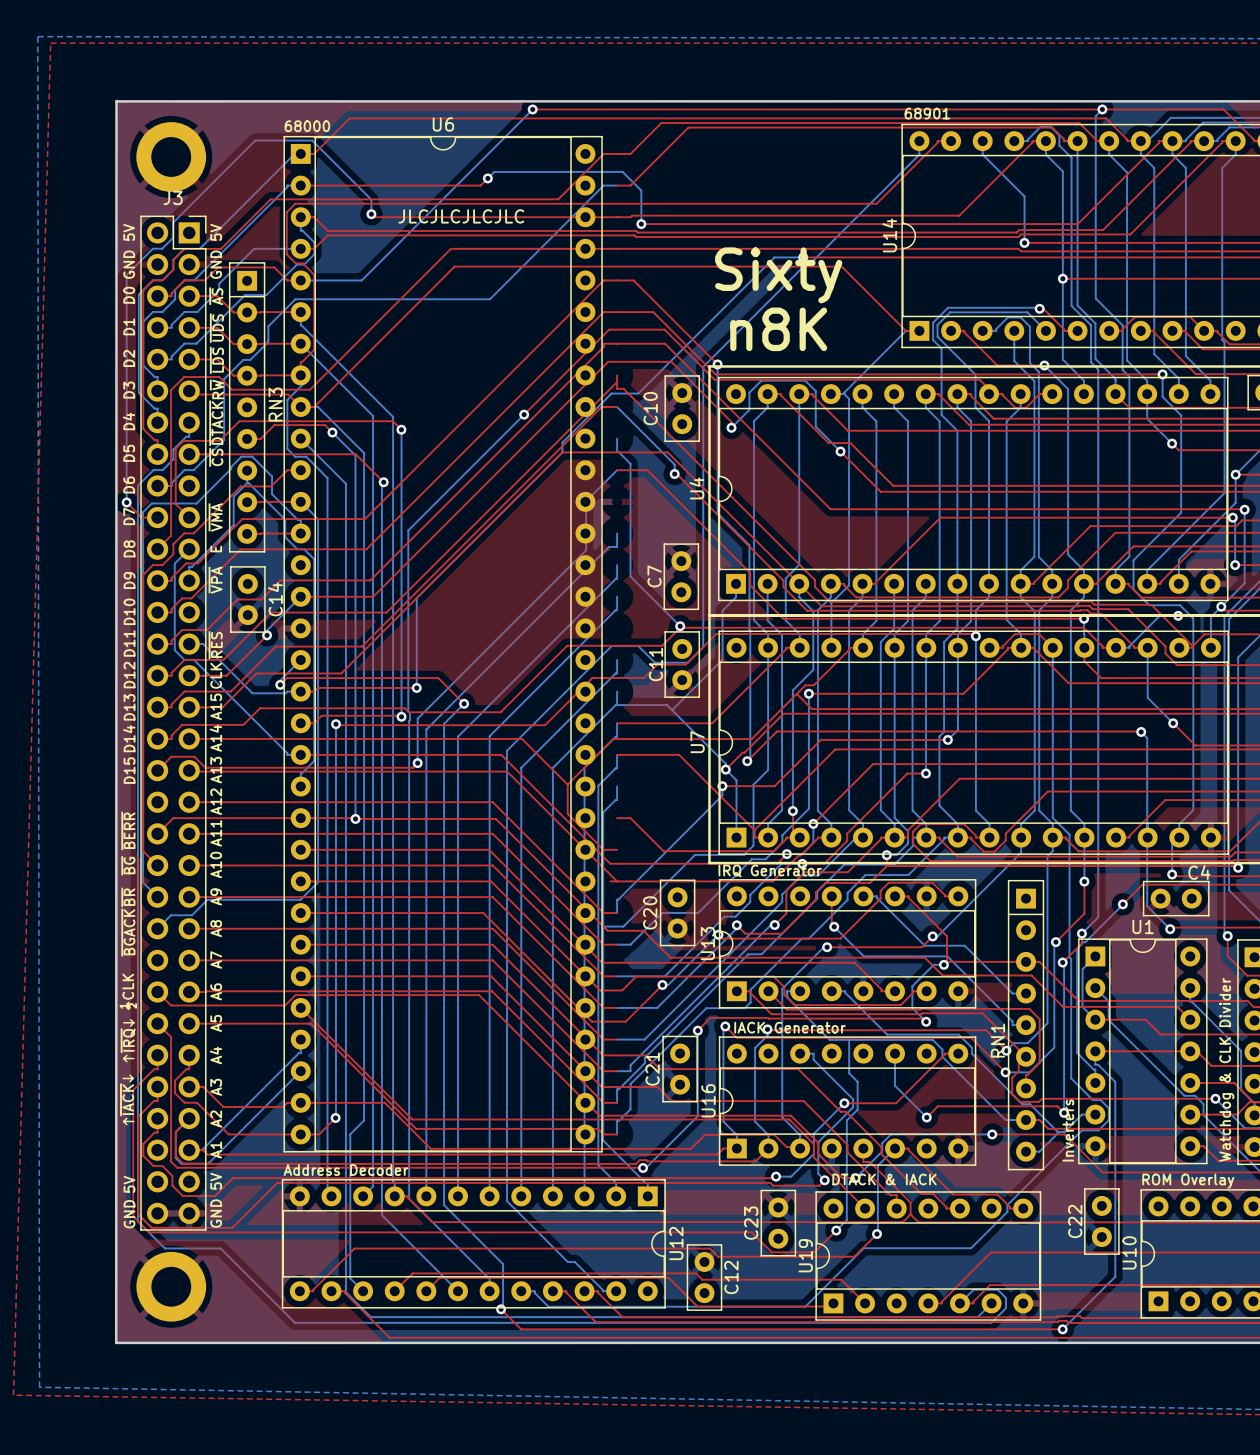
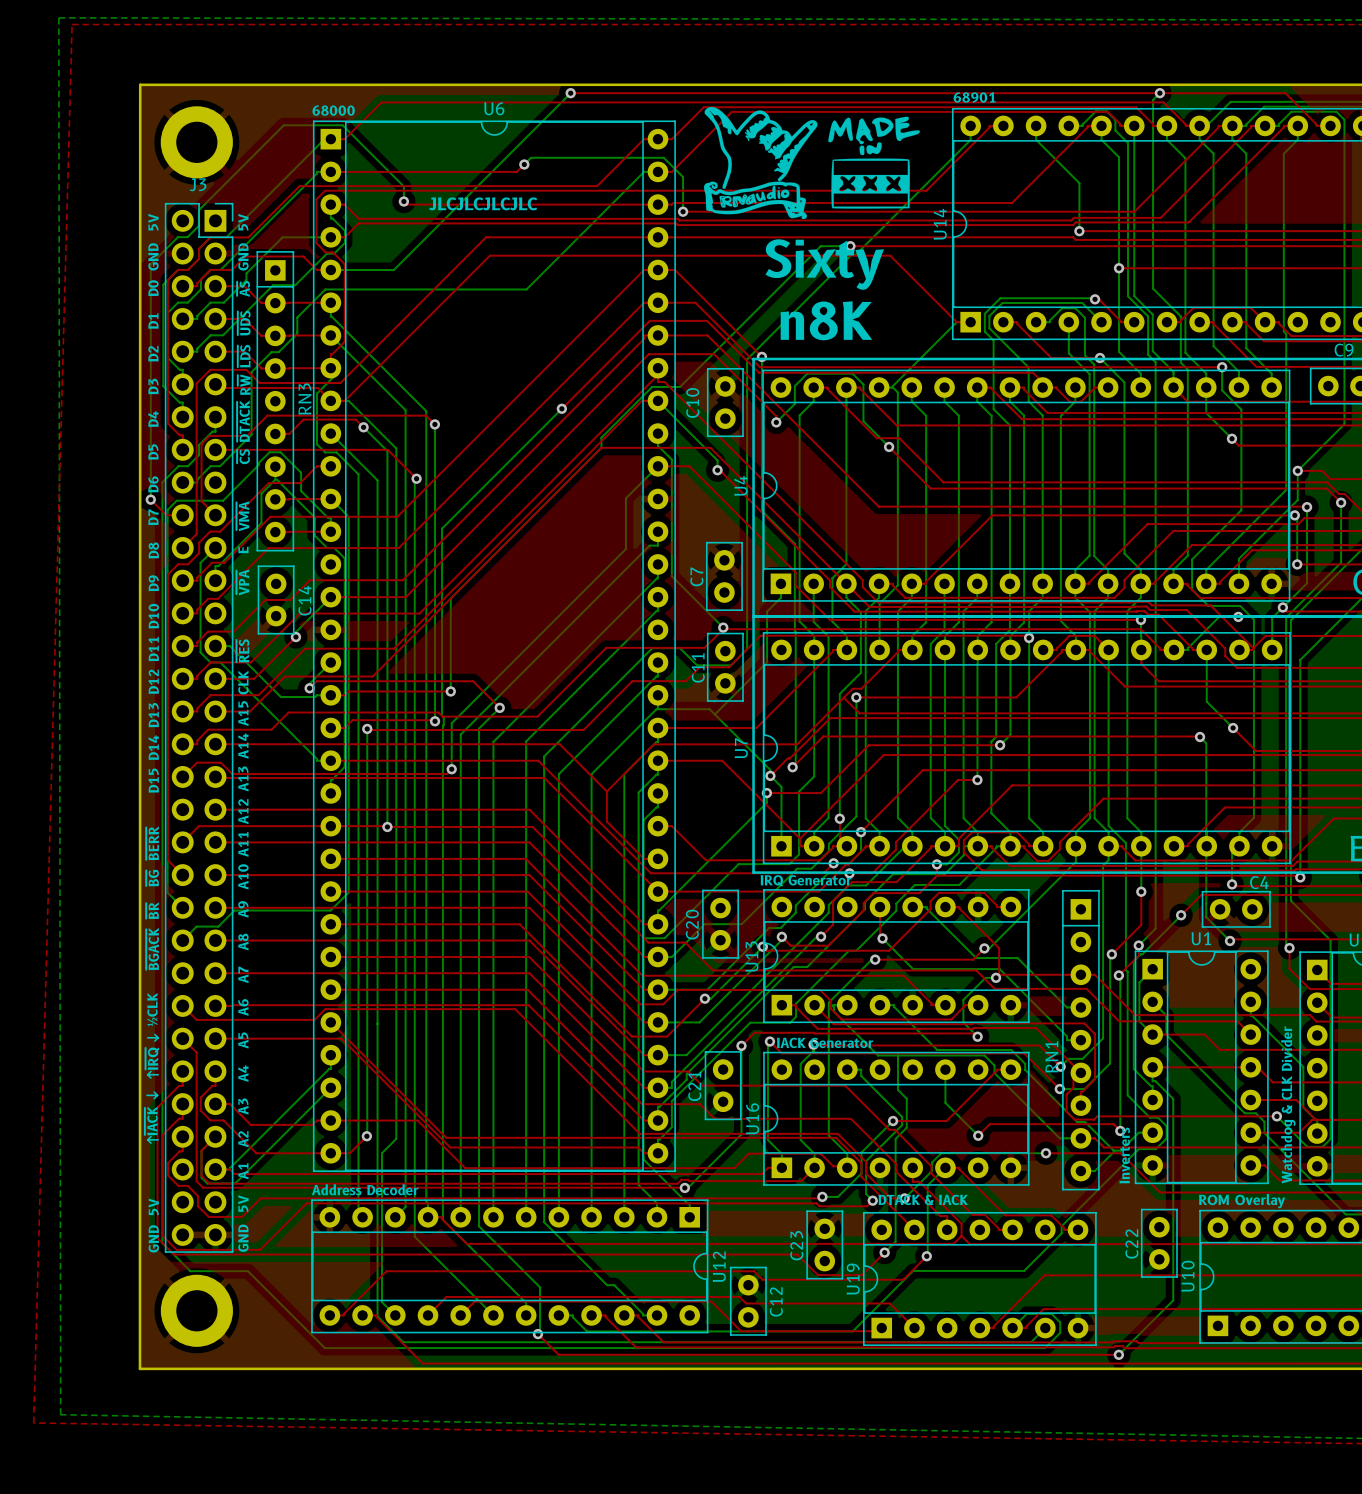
drawing: none -> [703, 106, 920, 220]
U6 footprint: [283, 135, 603, 1153] -> [312, 120, 676, 1172]

